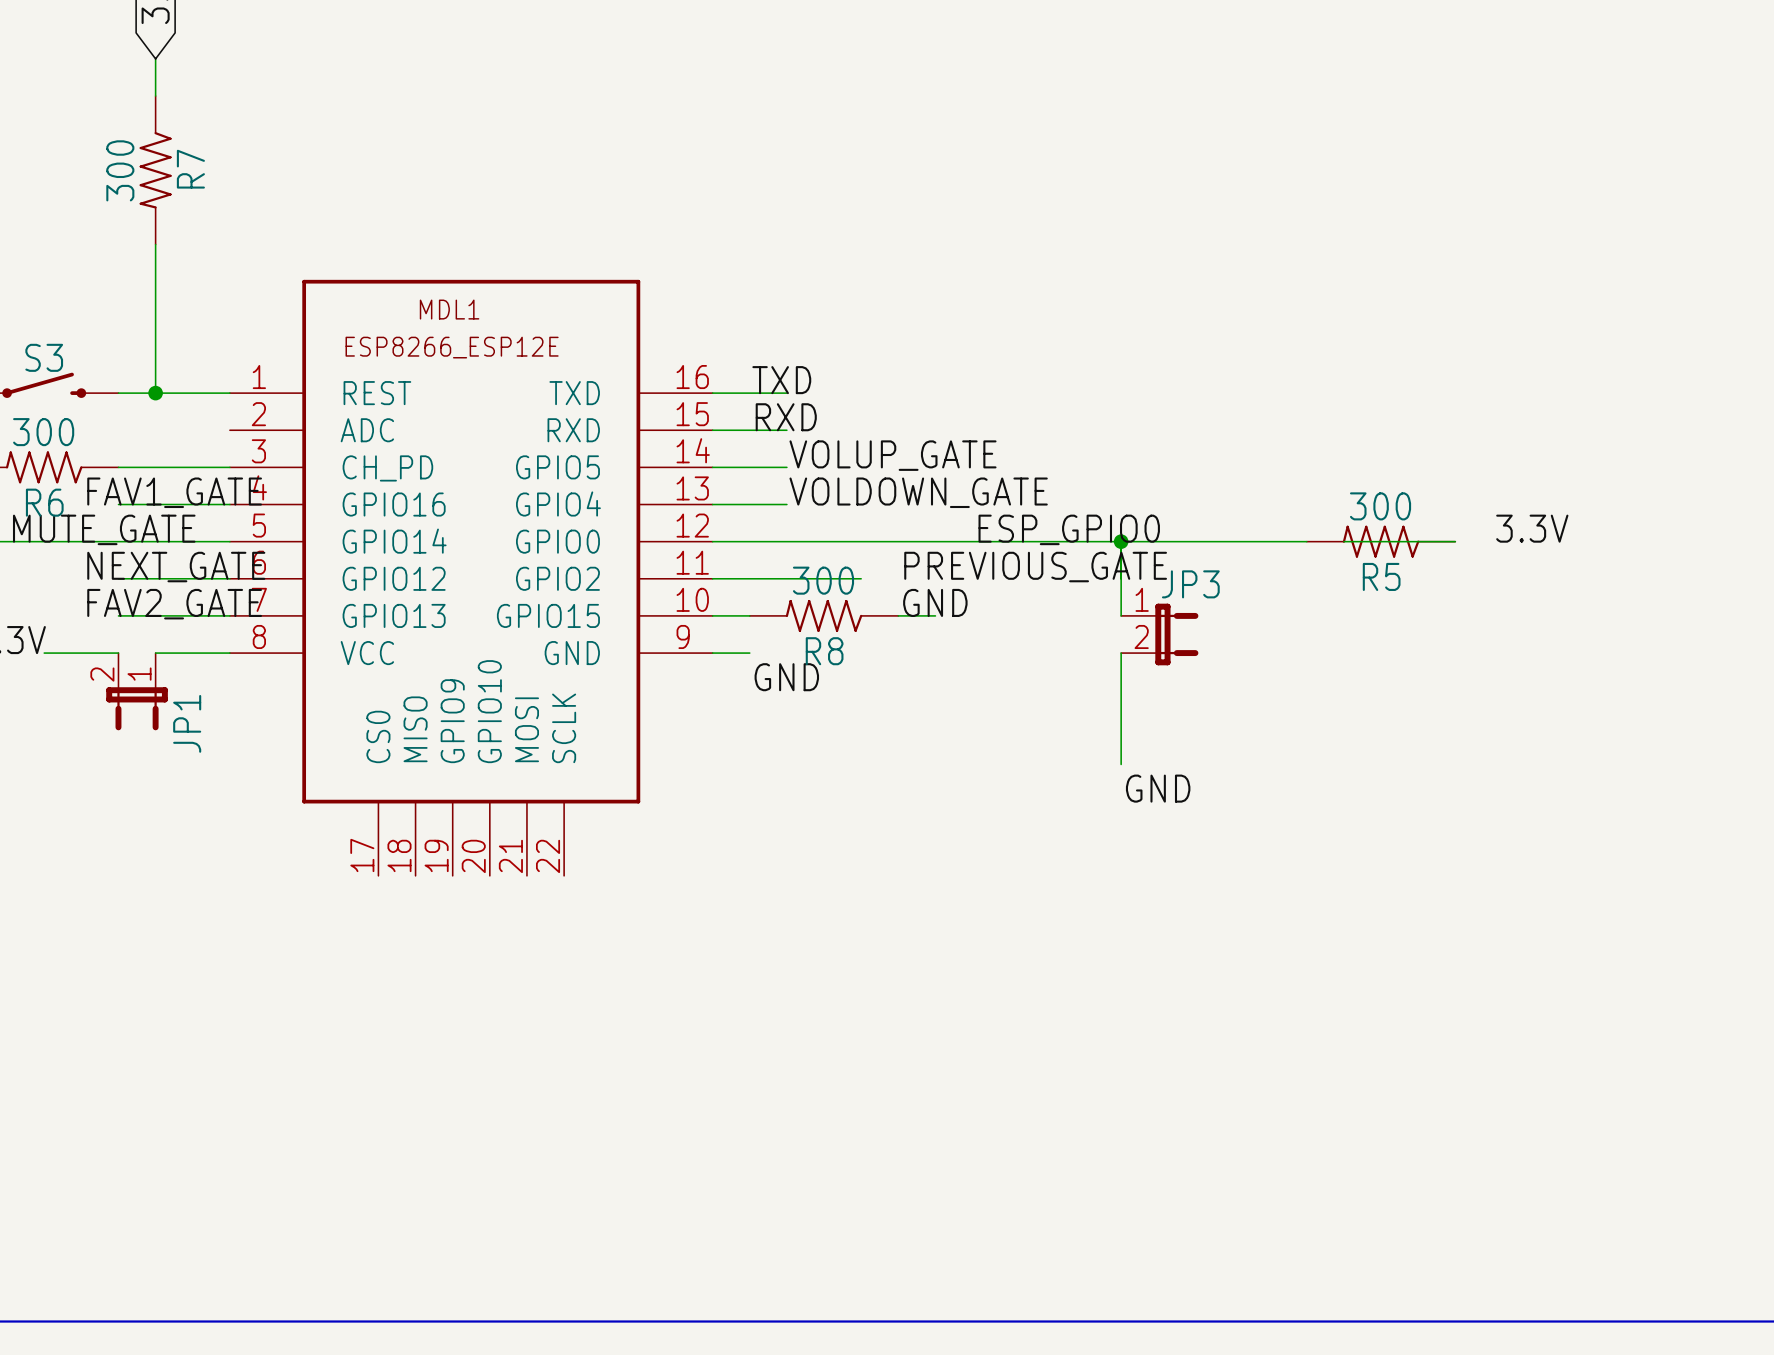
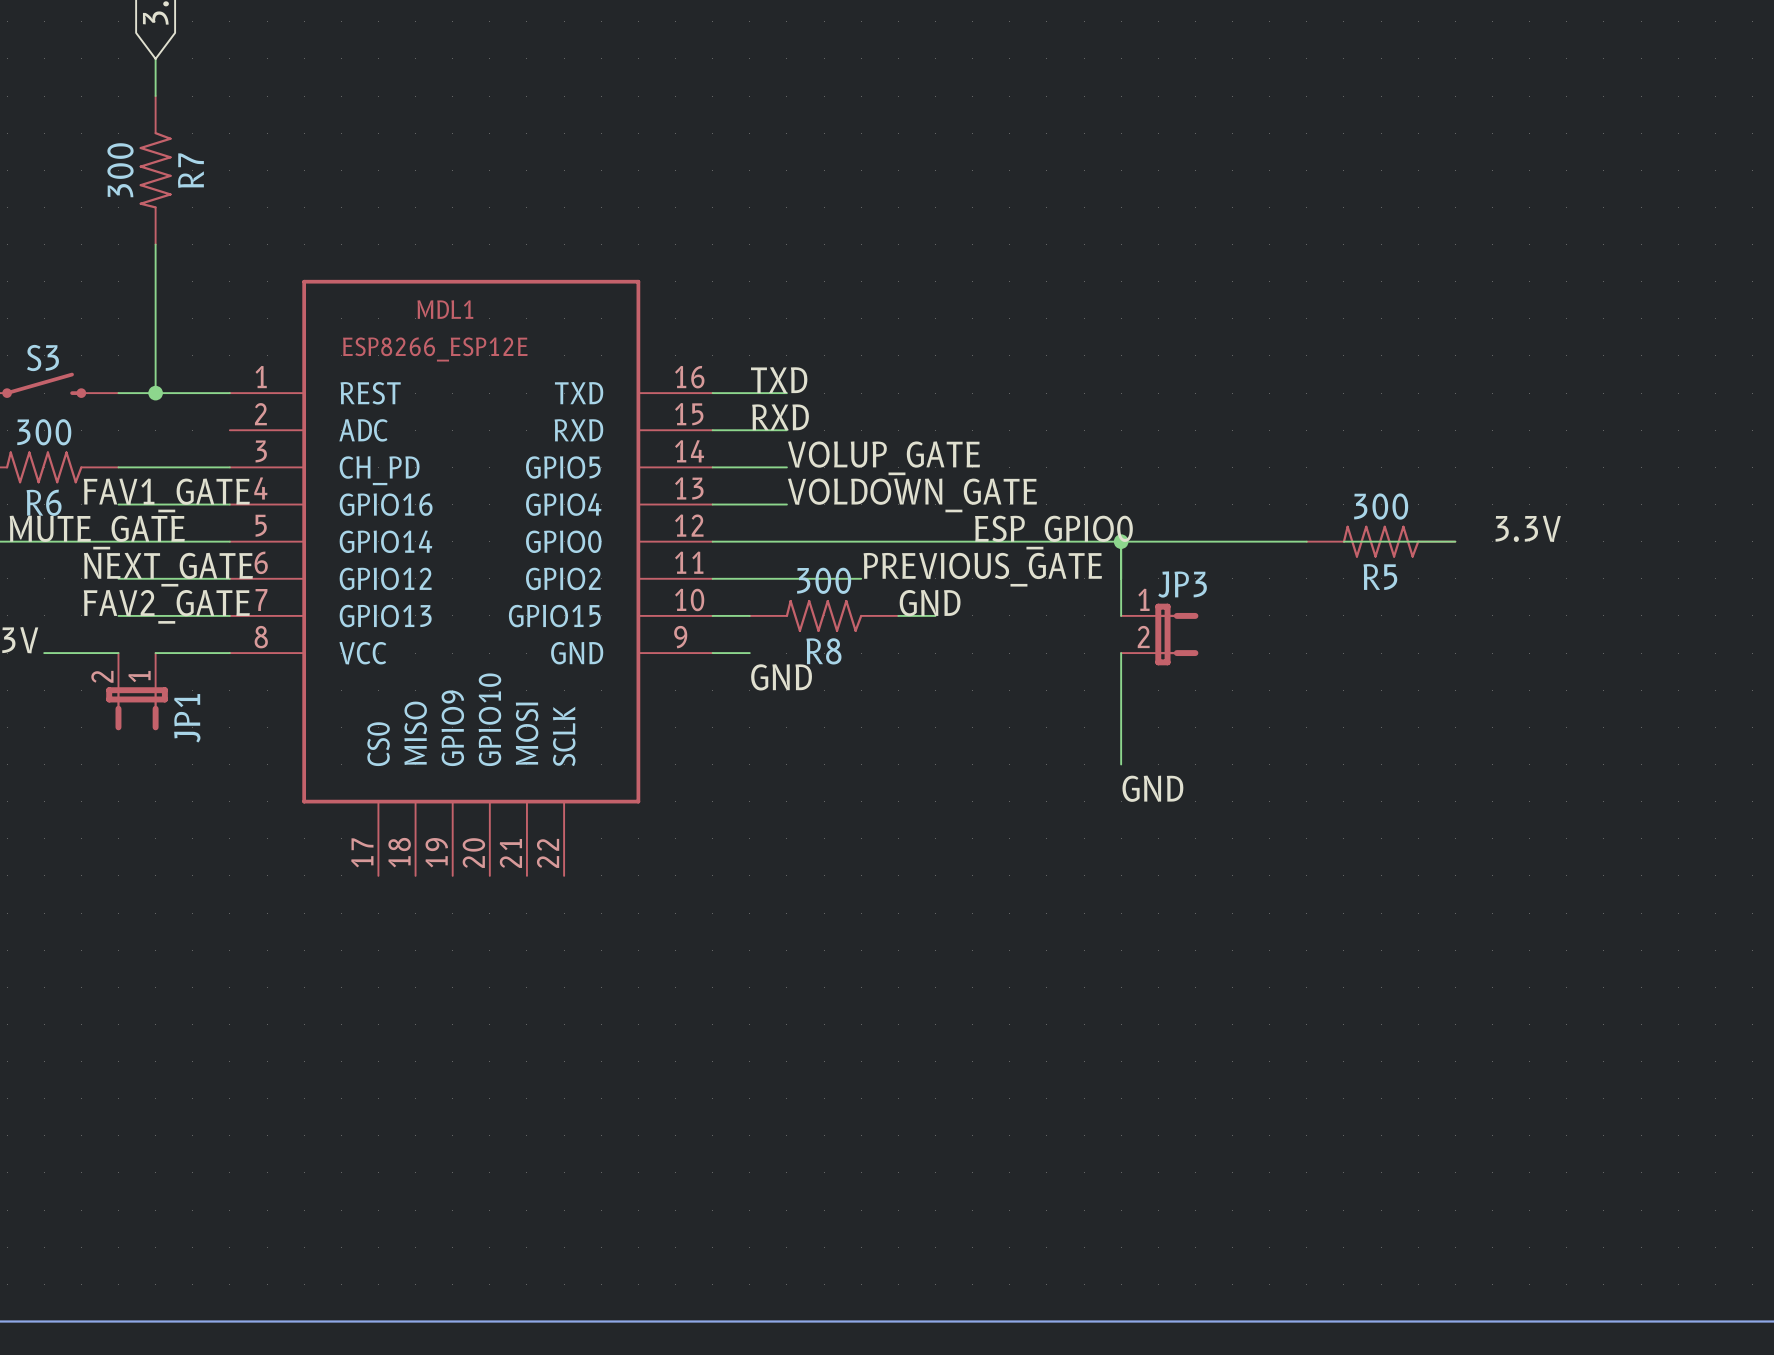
label position: PREVIOUS_GATE (1035, 567) -> PREVIOUS_GATE (982, 569)

